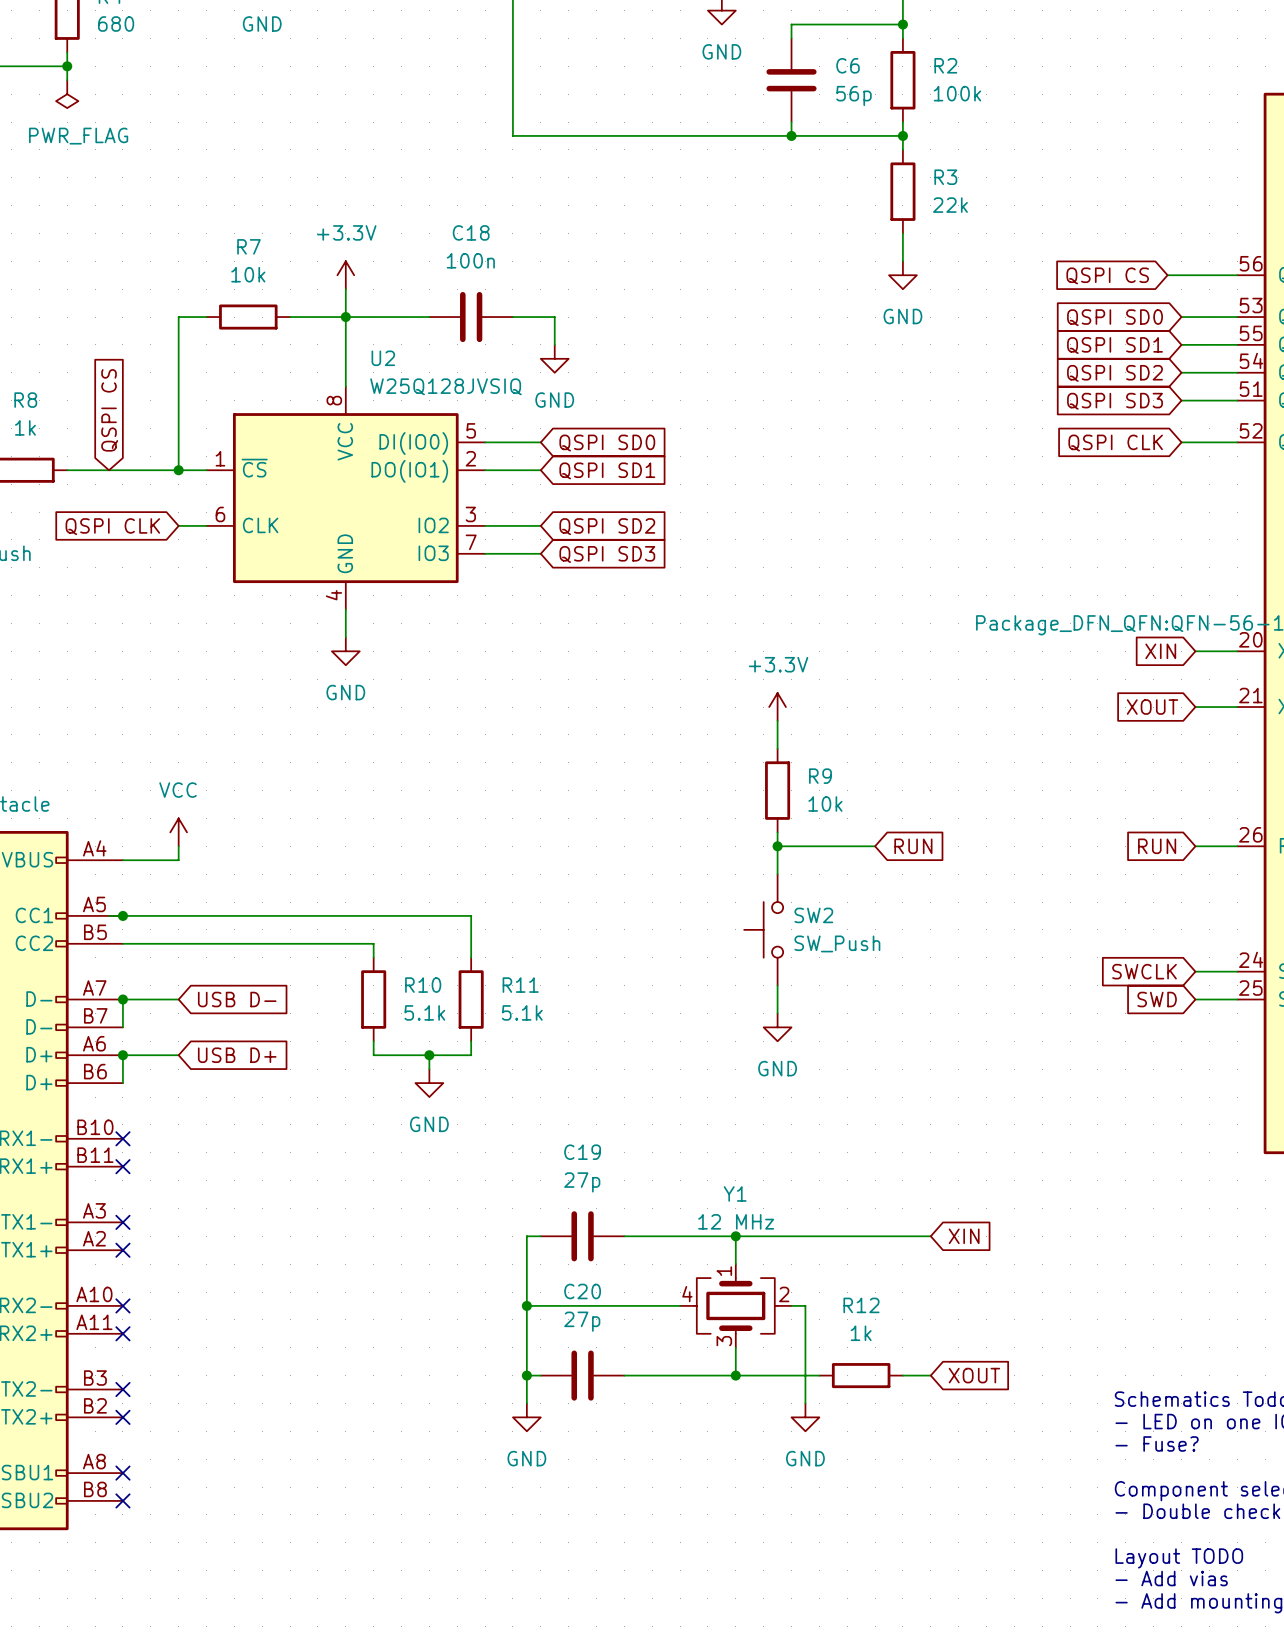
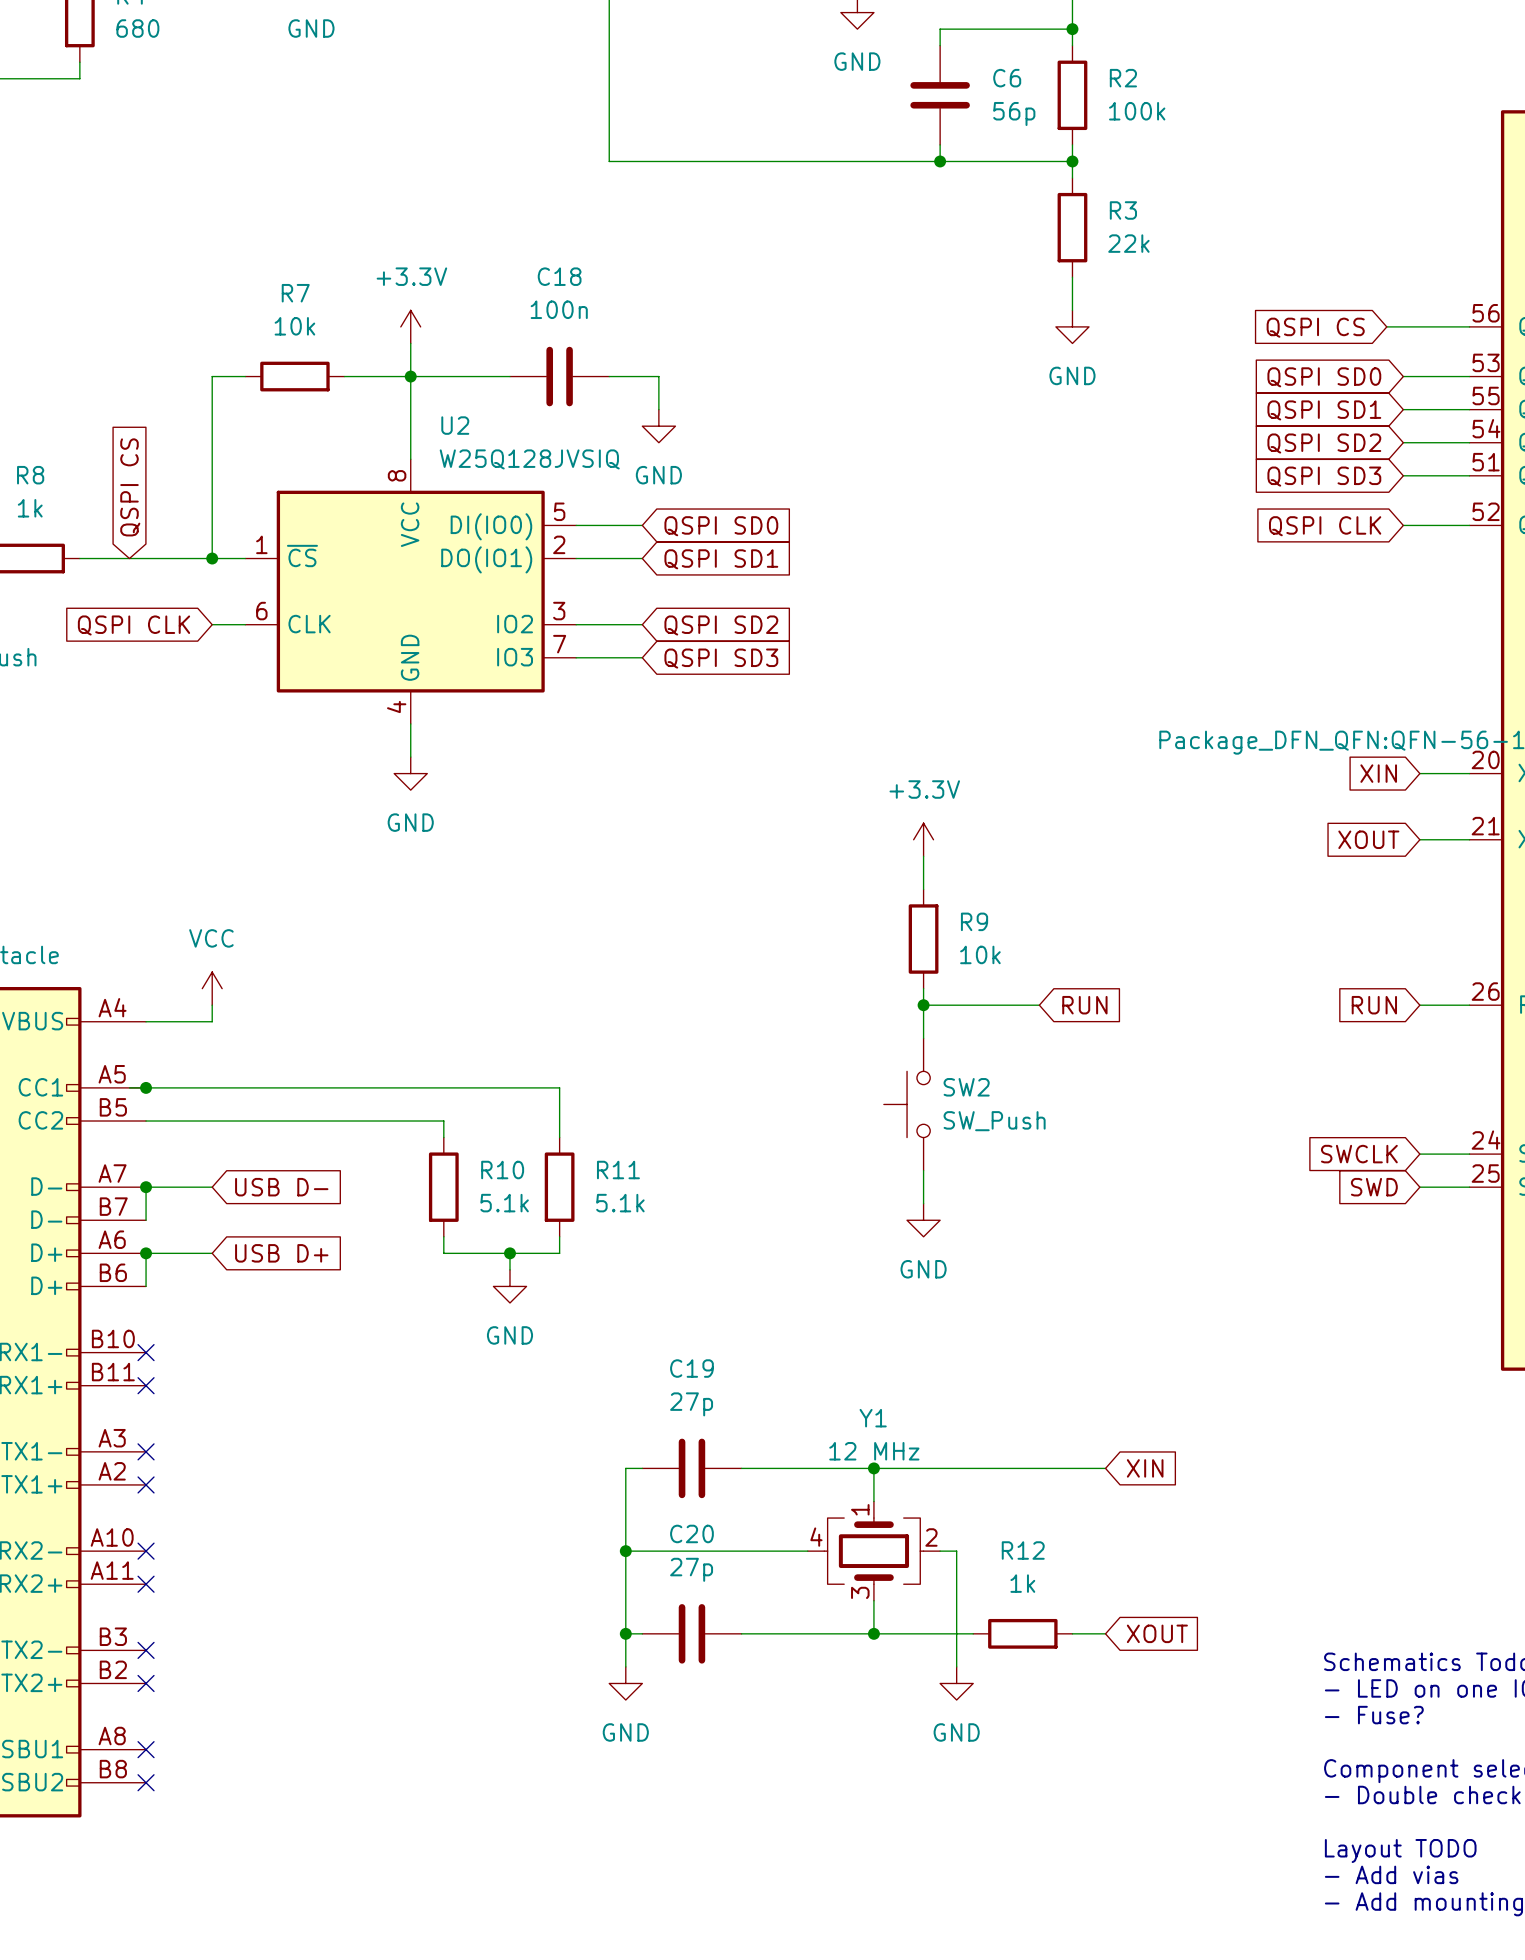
wire: (67, 66) (67, 80) -> none
junction: (67, 66) -> none
power symbol: PWR_FLAG (67, 94) -> none

